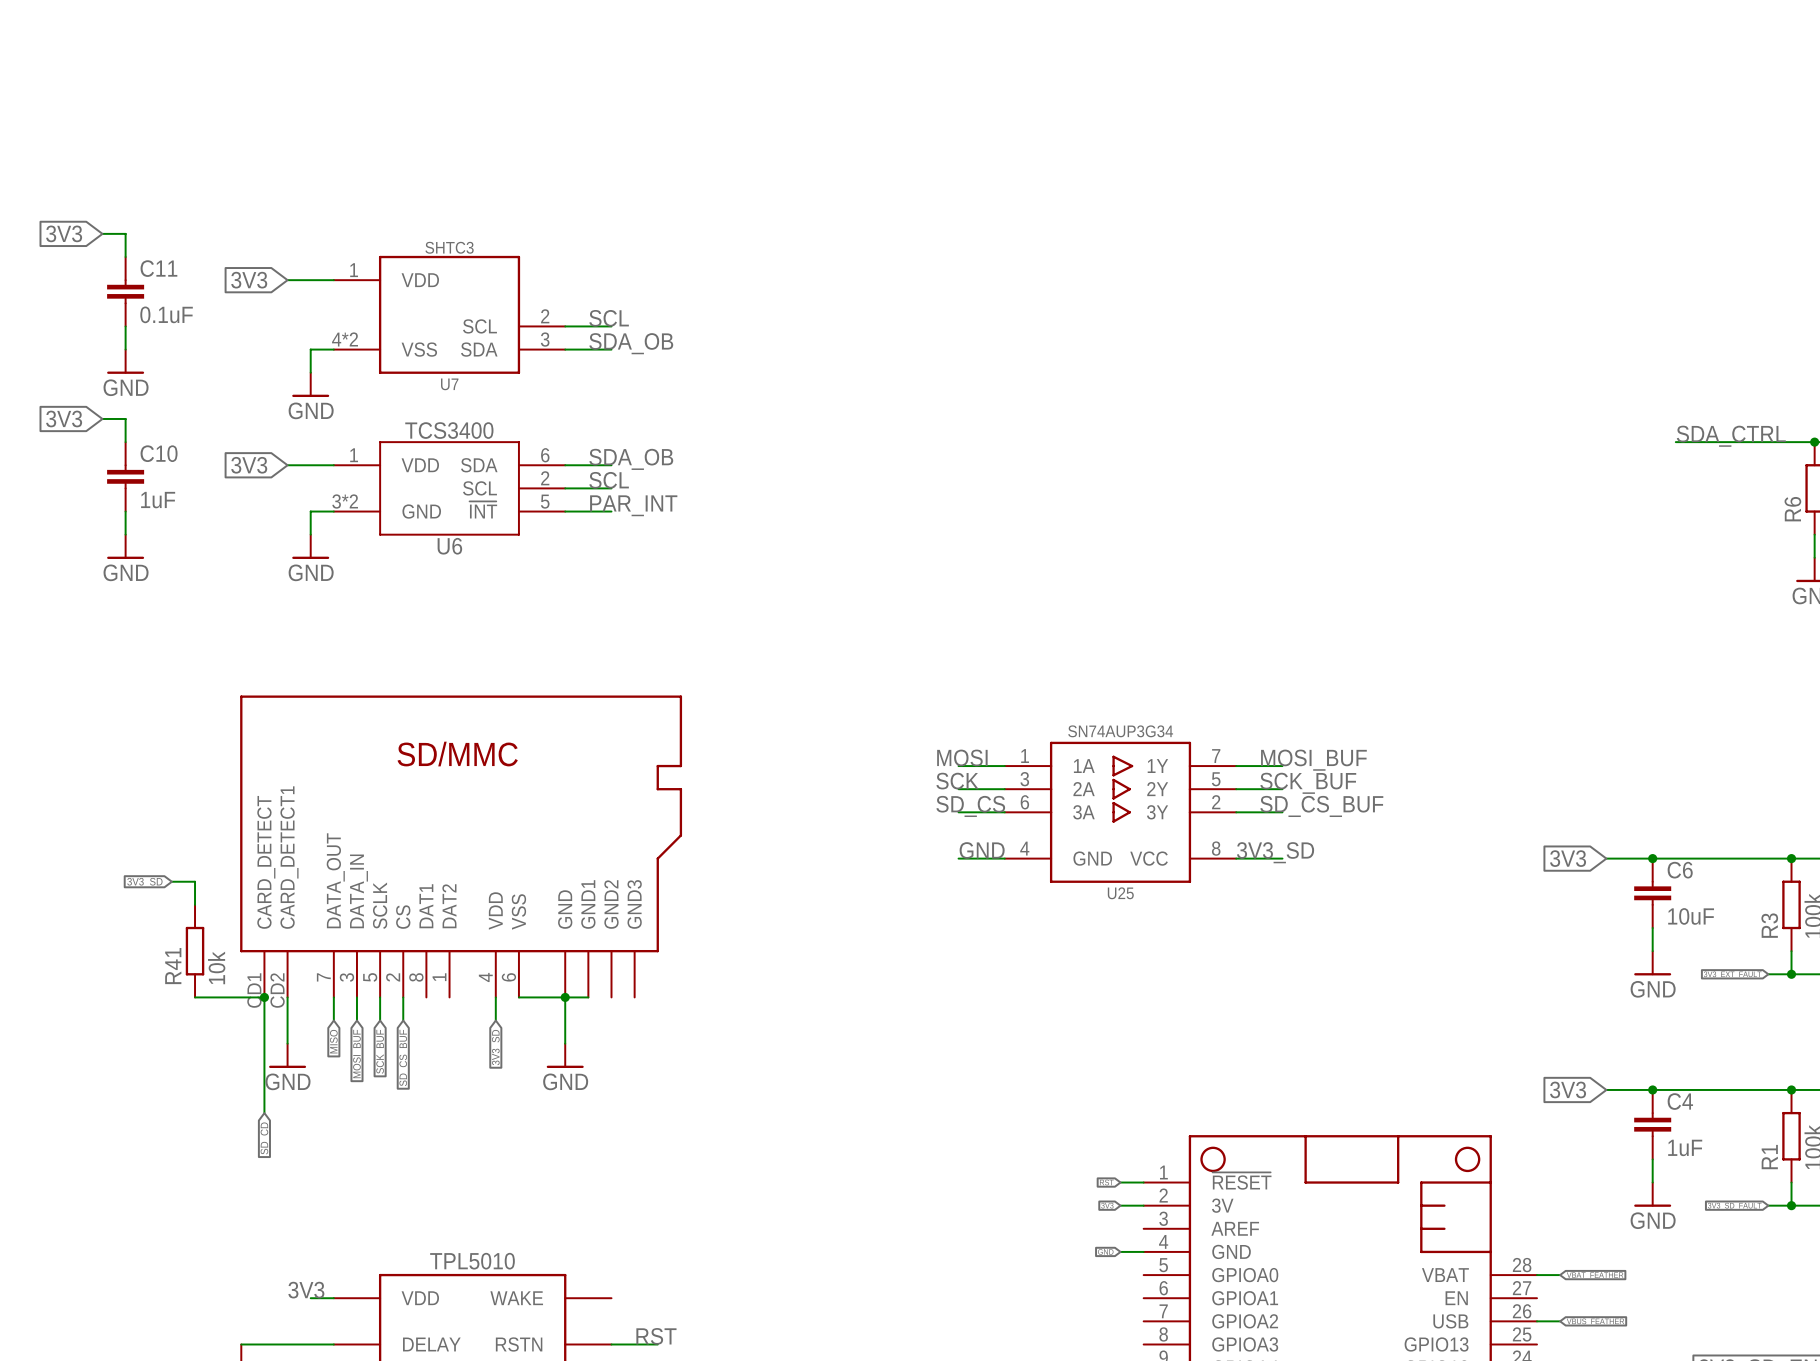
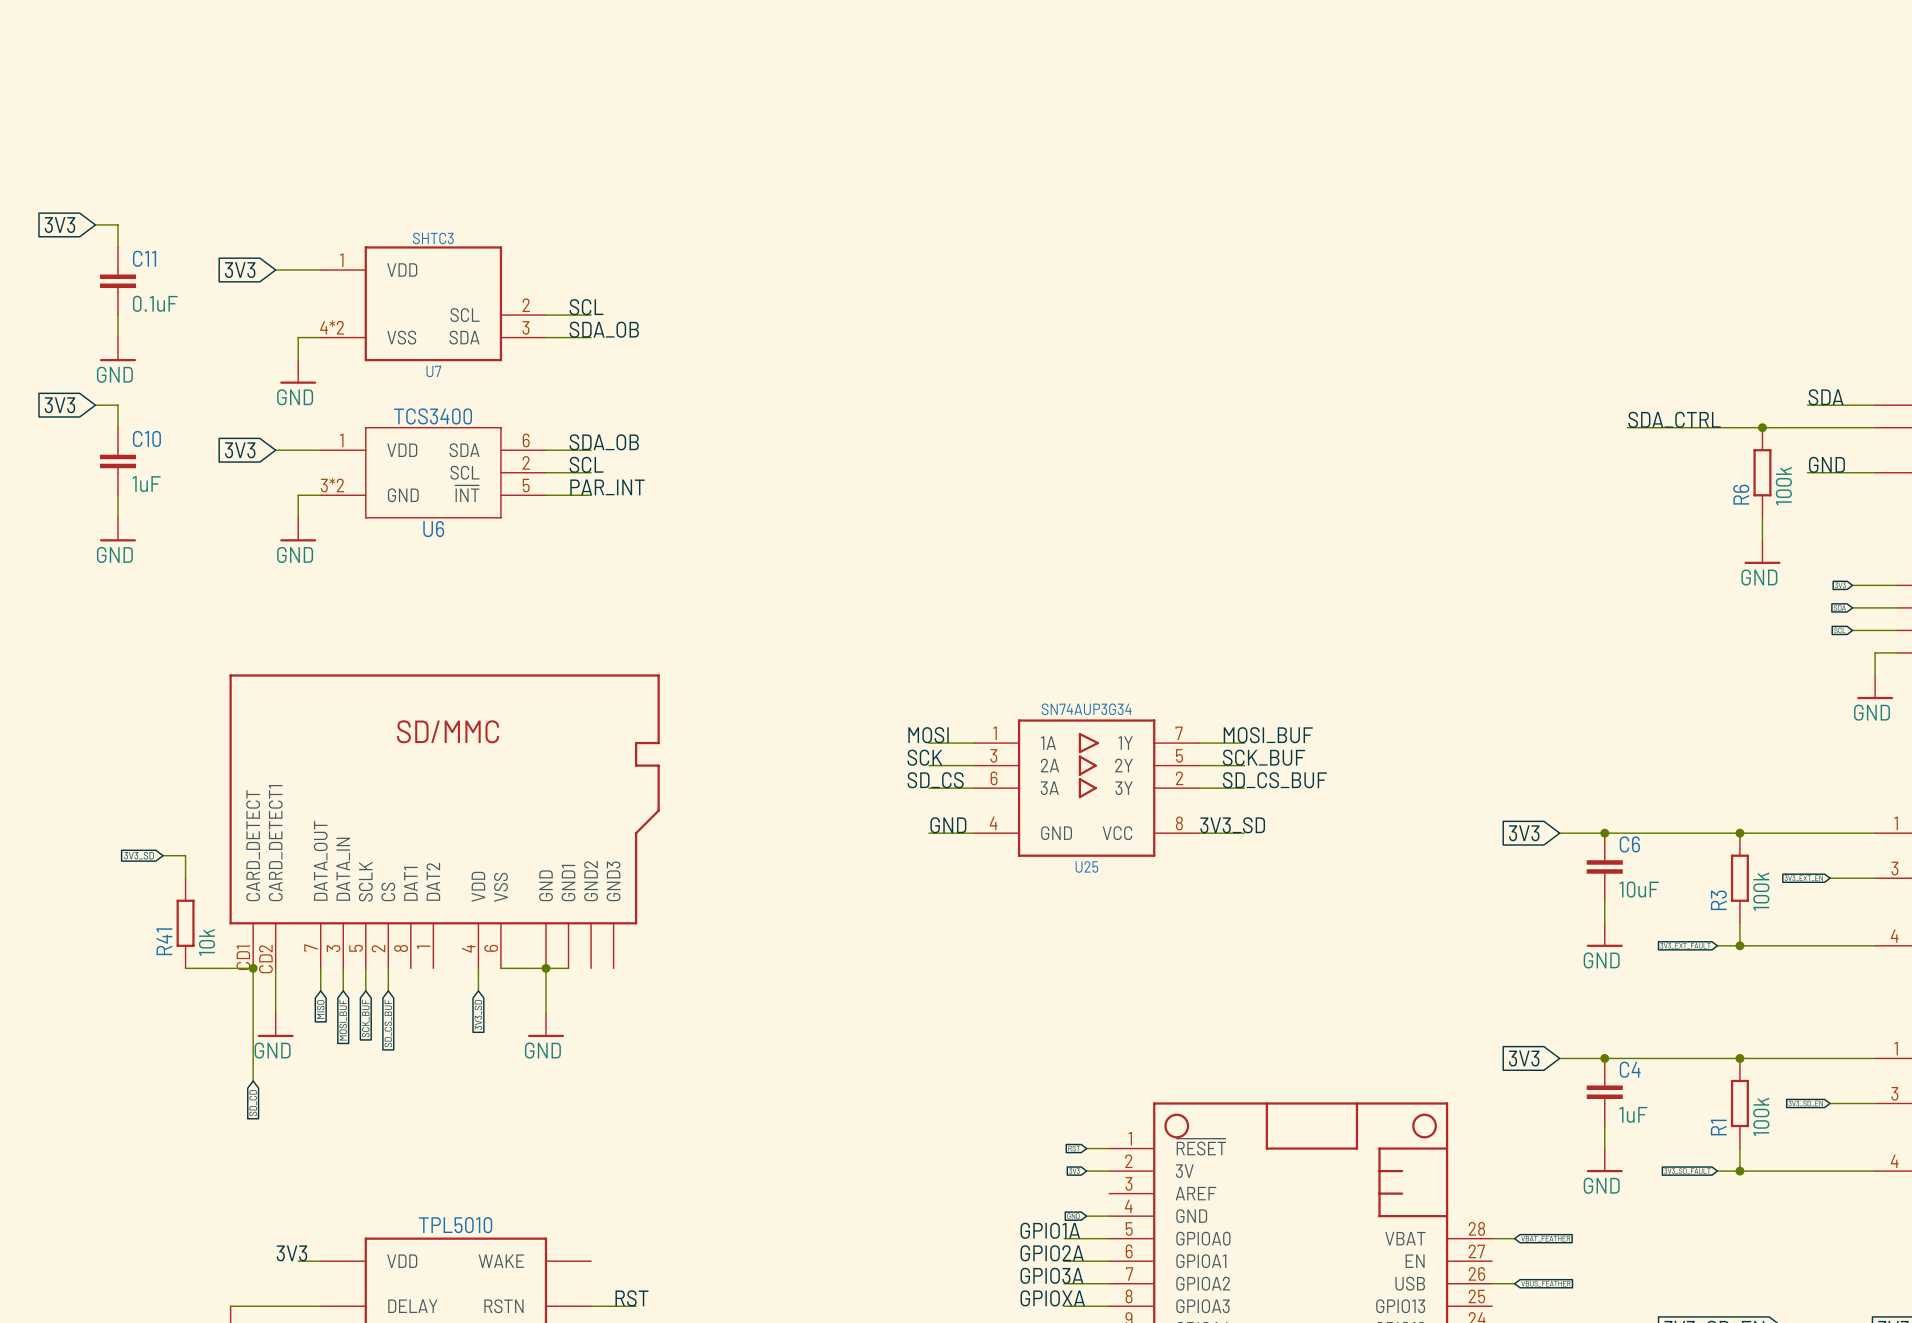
label: none -> GPIO1A (1050, 1230)
wire: none -> (1064, 1238) (1109, 1238)
label: none -> GPIO2A (1052, 1253)
wire: none -> (1064, 1261) (1109, 1261)
label: none -> GPIO3A (1051, 1275)
wire: none -> (1064, 1283) (1109, 1283)
label: none -> GPIOXA (1052, 1298)
wire: none -> (1064, 1306) (1109, 1306)

